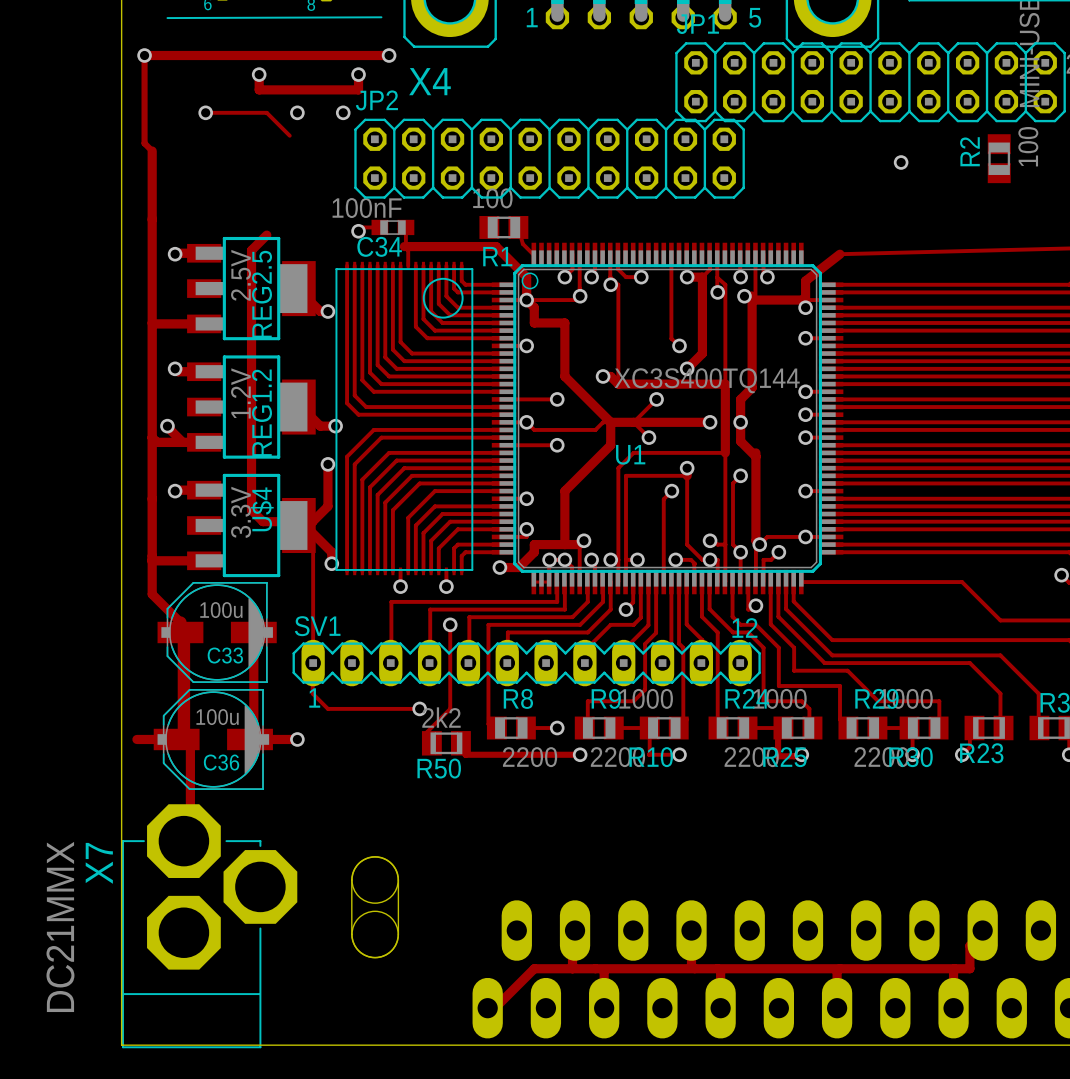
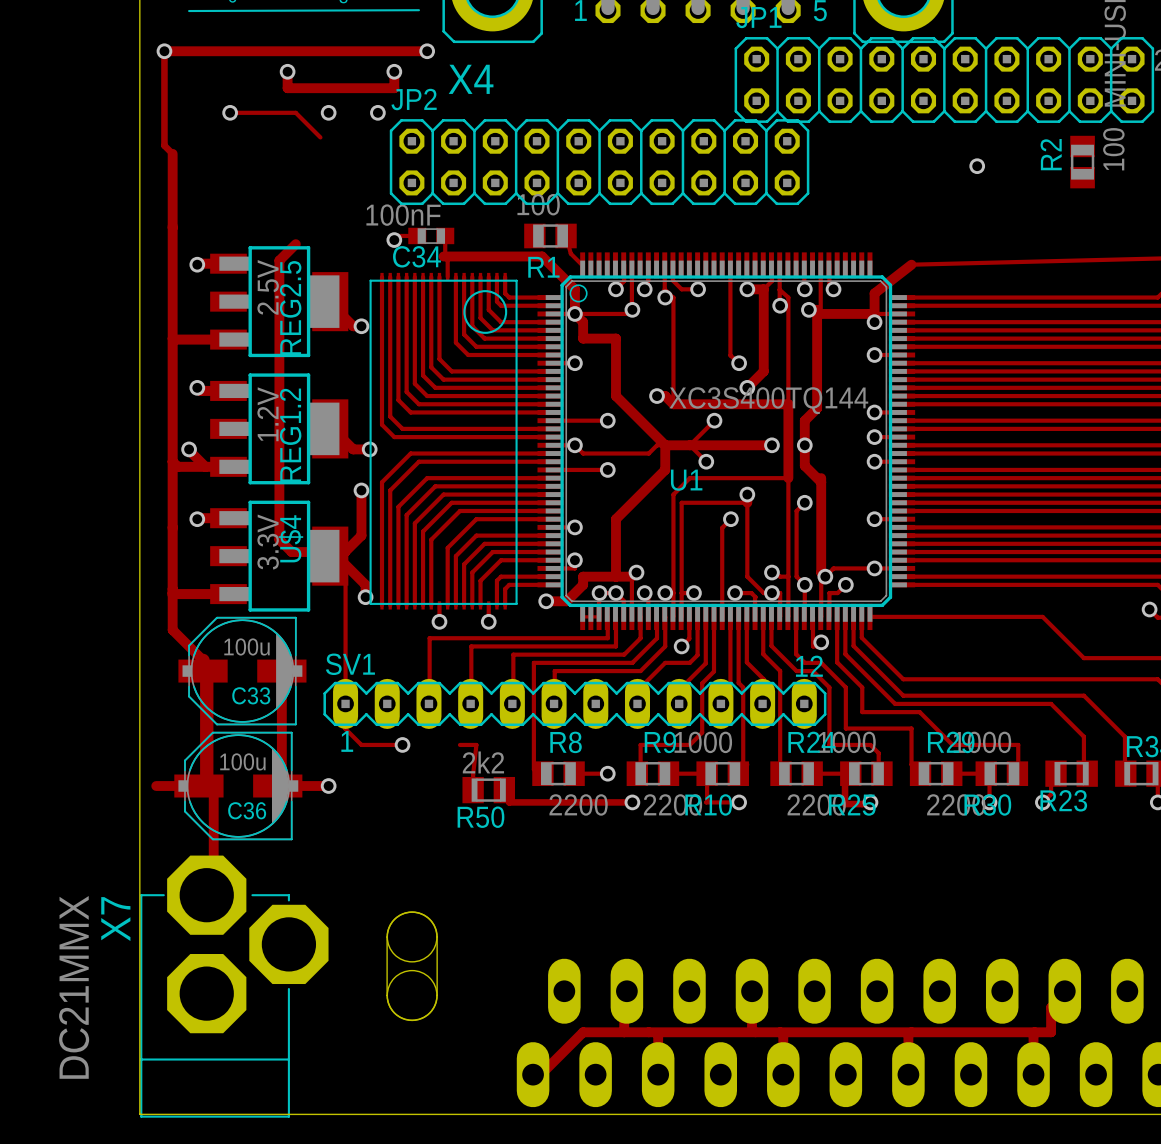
track: (450, 624) (450, 708) (427, 731) (427, 747) -> none
via: (450, 624) -> none
track: (312, 685) (312, 693) (327, 708) (419, 708) -> (345, 728) (361, 744) (402, 744)
track: none -> (460, 744) (476, 744) (473, 790)
via position: (419, 708) -> (402, 744)

